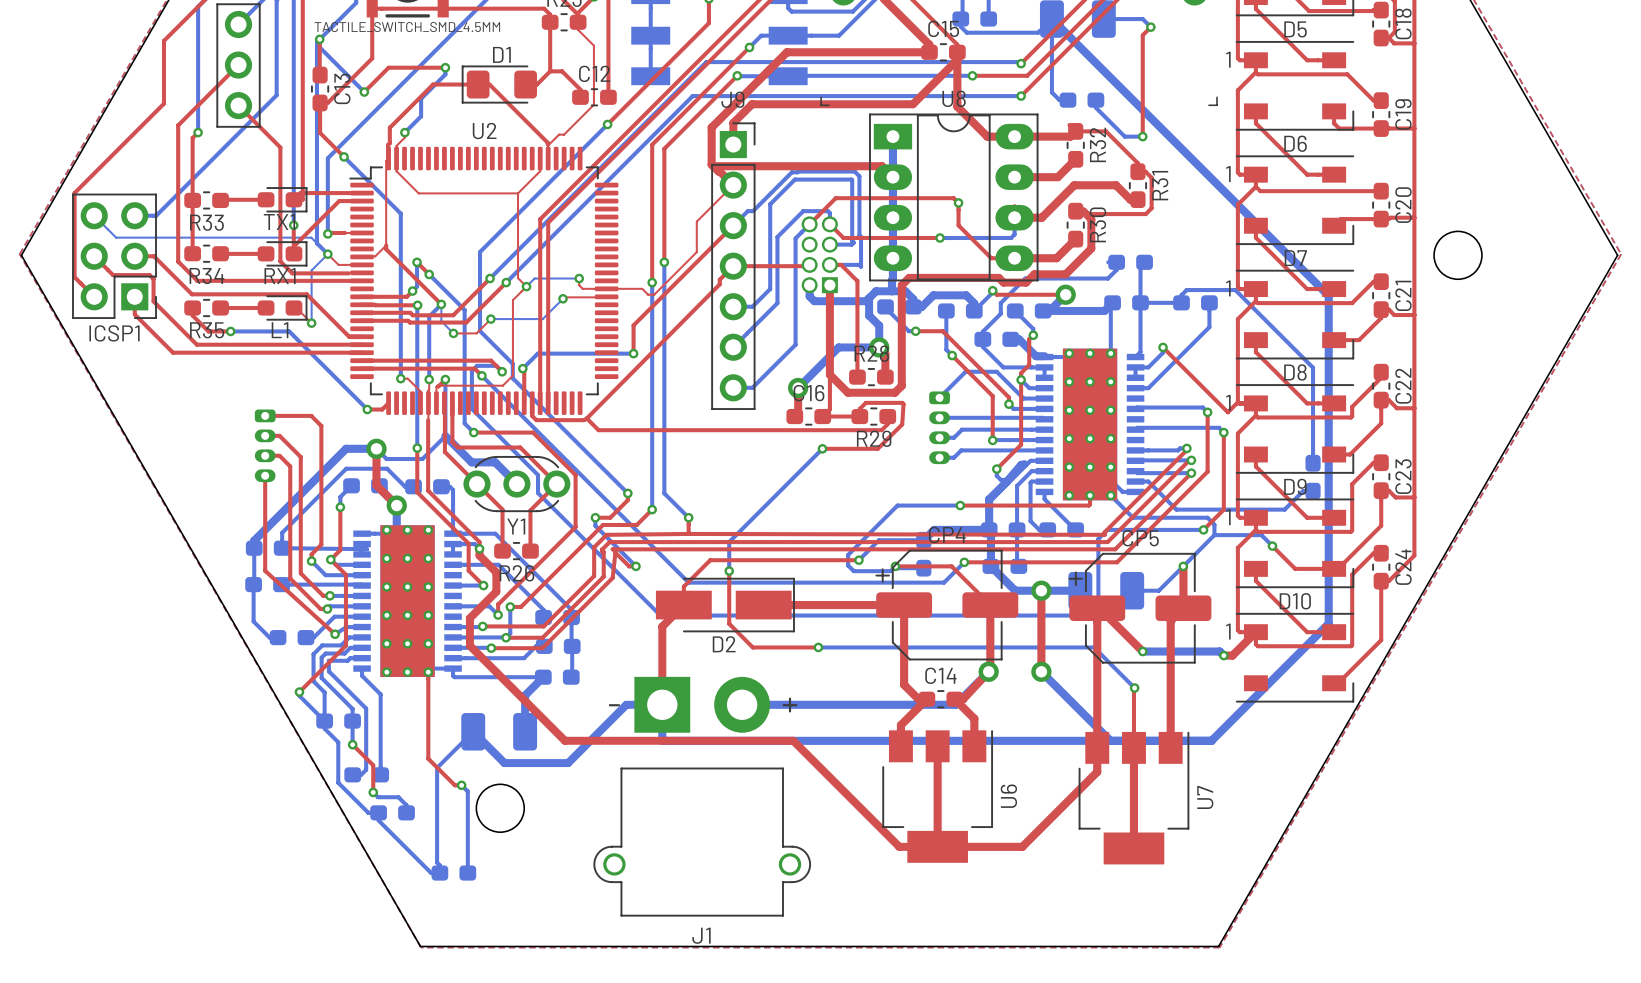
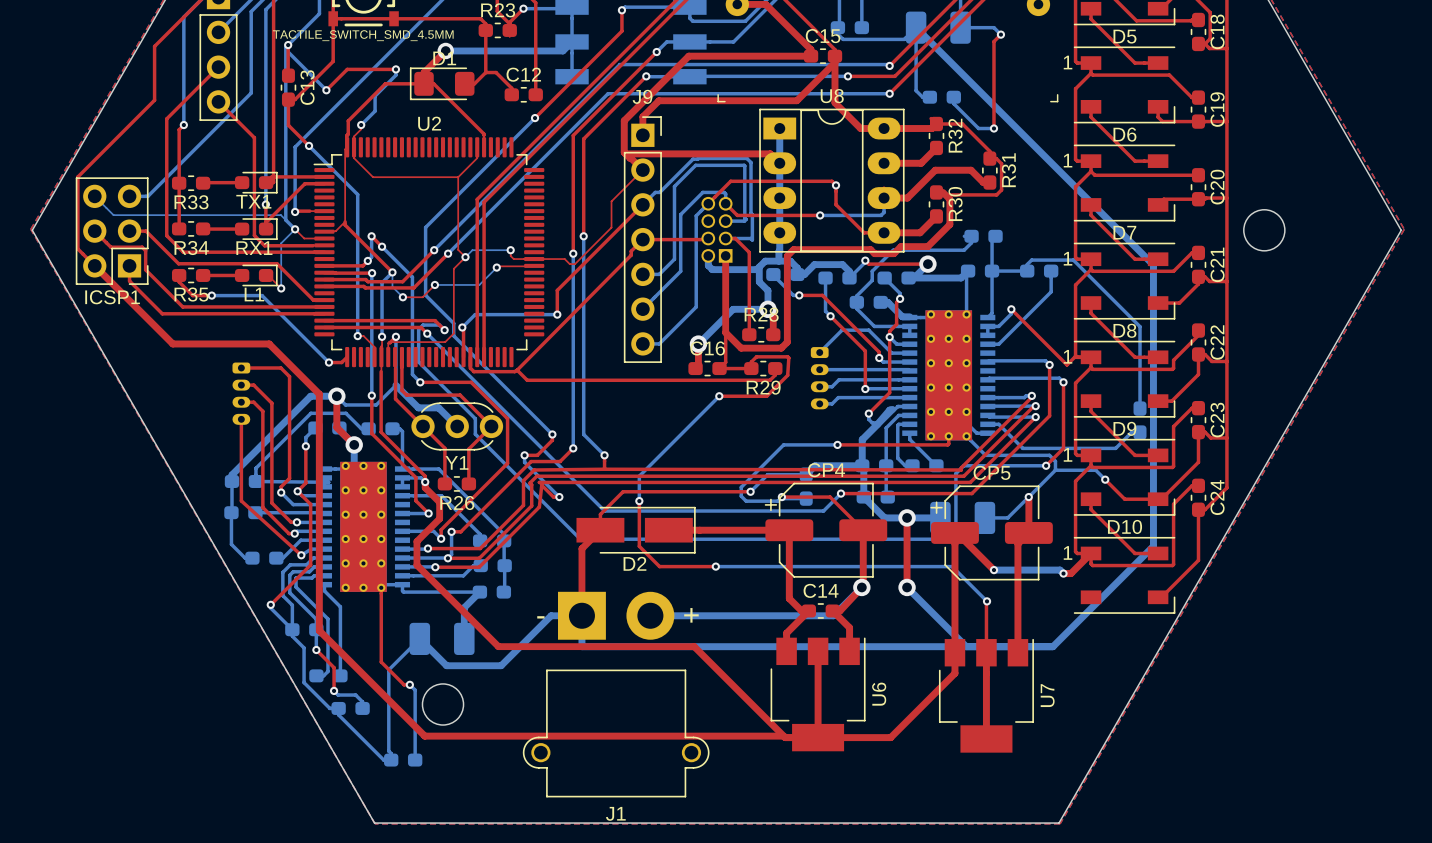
top track: (578, 29) (593, 45) (593, 104) (564, 134) (559, 134) (548, 145) -> none
bottom track: none -> (572, 41) (562, 50) (445, 50)
top track: none -> (445, 50) (424, 72) (424, 83)
via: none -> (445, 50)
top track: none -> (94, 265) (172, 343) (269, 343) (319, 394) (319, 630) (424, 736) (818, 737)

